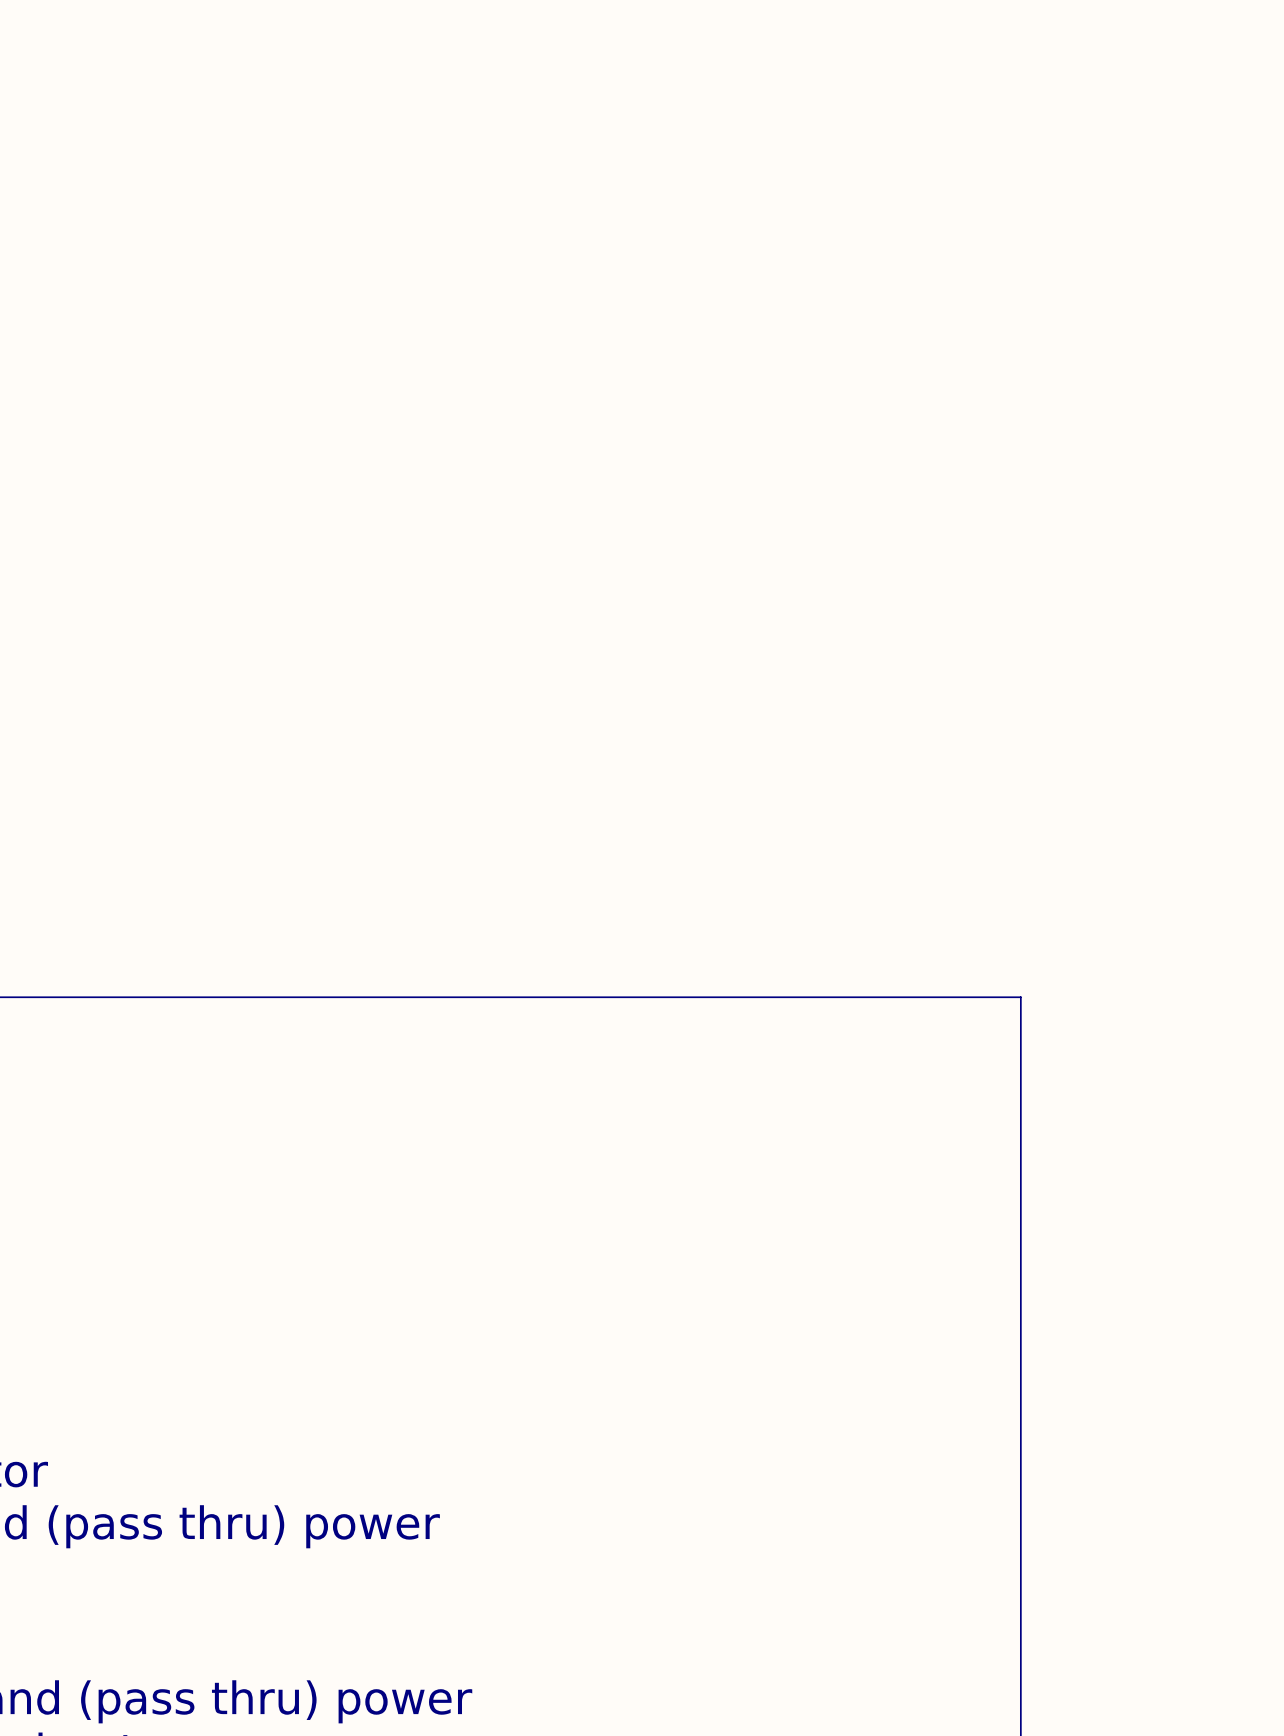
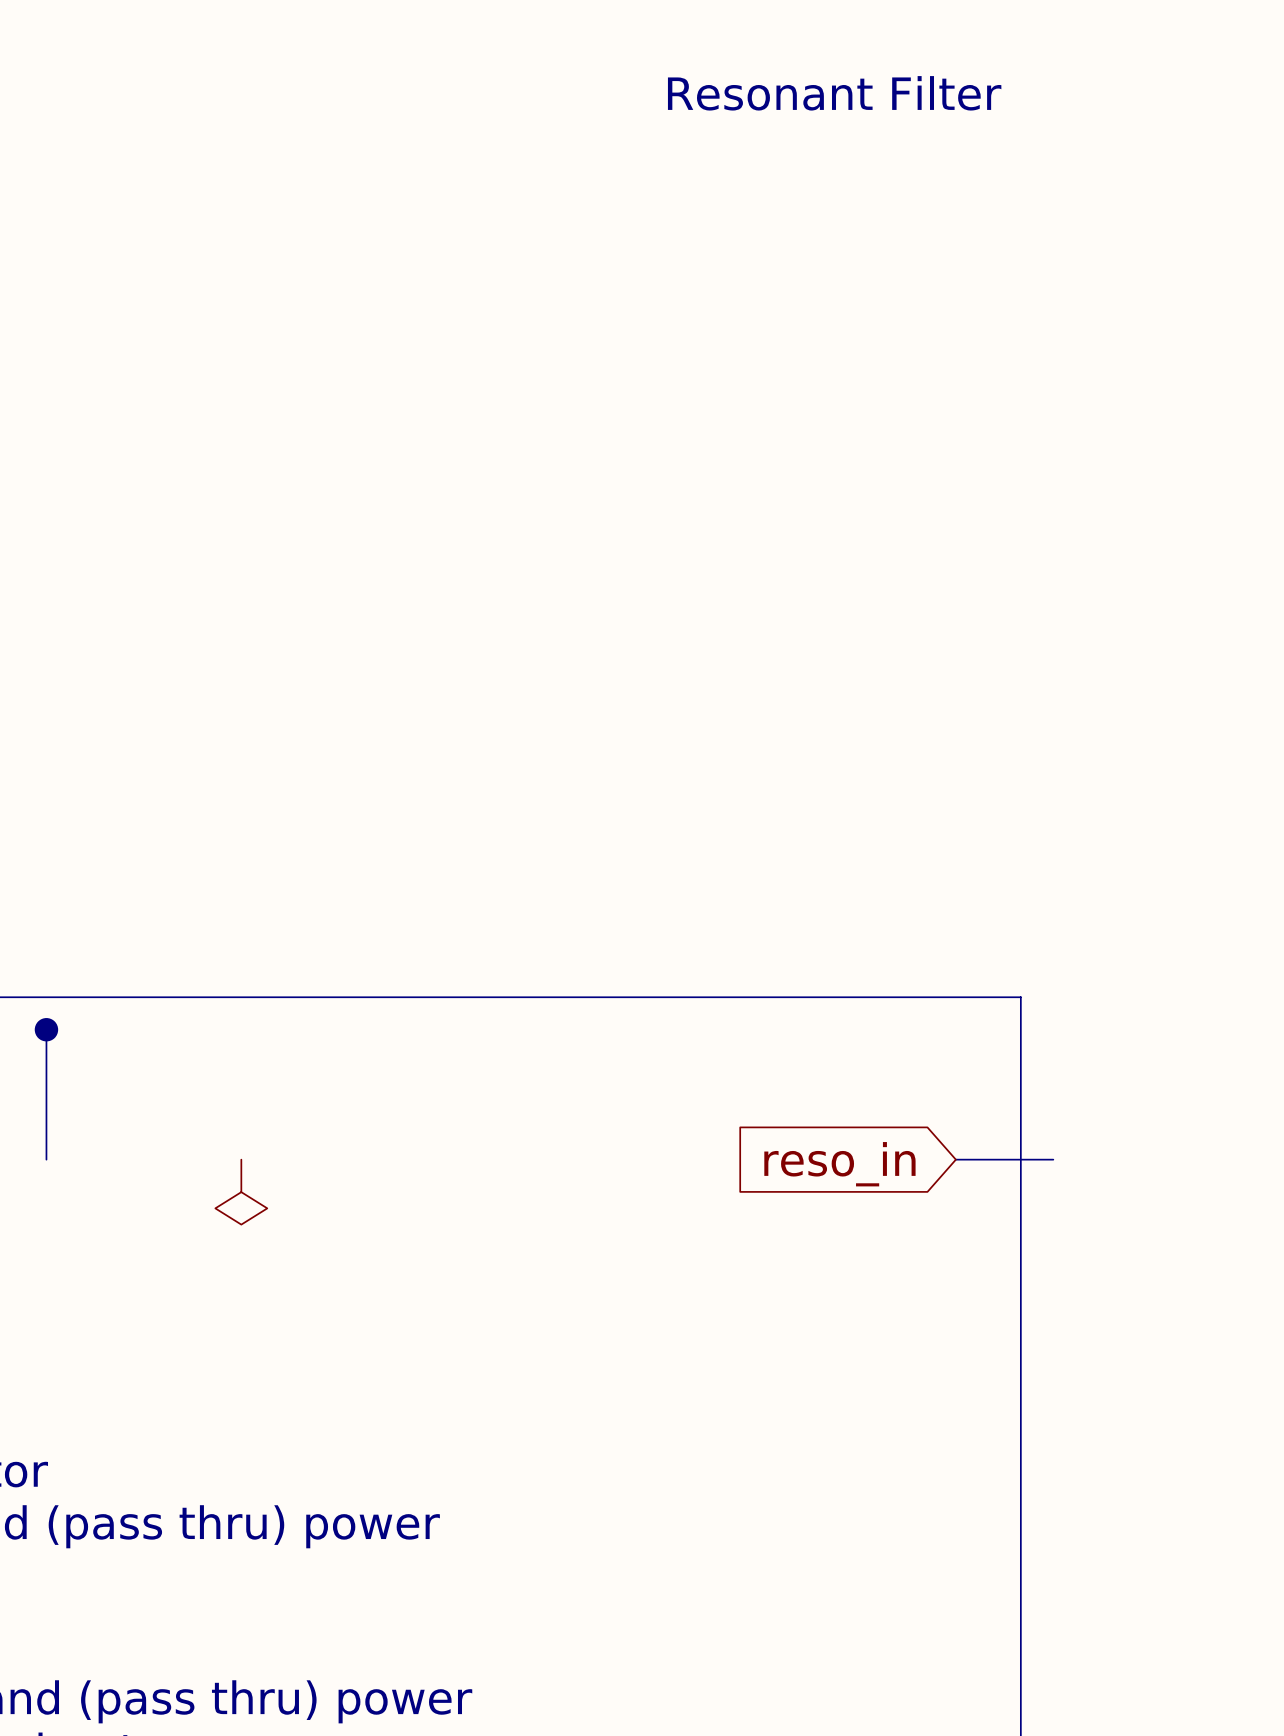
text: none -> Resonant Filter (834, 93)
wire: none -> (46, 1029) (46, 1159)
junction: none -> (46, 1029)
wire: none -> (955, 1159) (1053, 1159)
global label: none -> reso_in (839, 1164)
power symbol: none -> (241, 1192)

